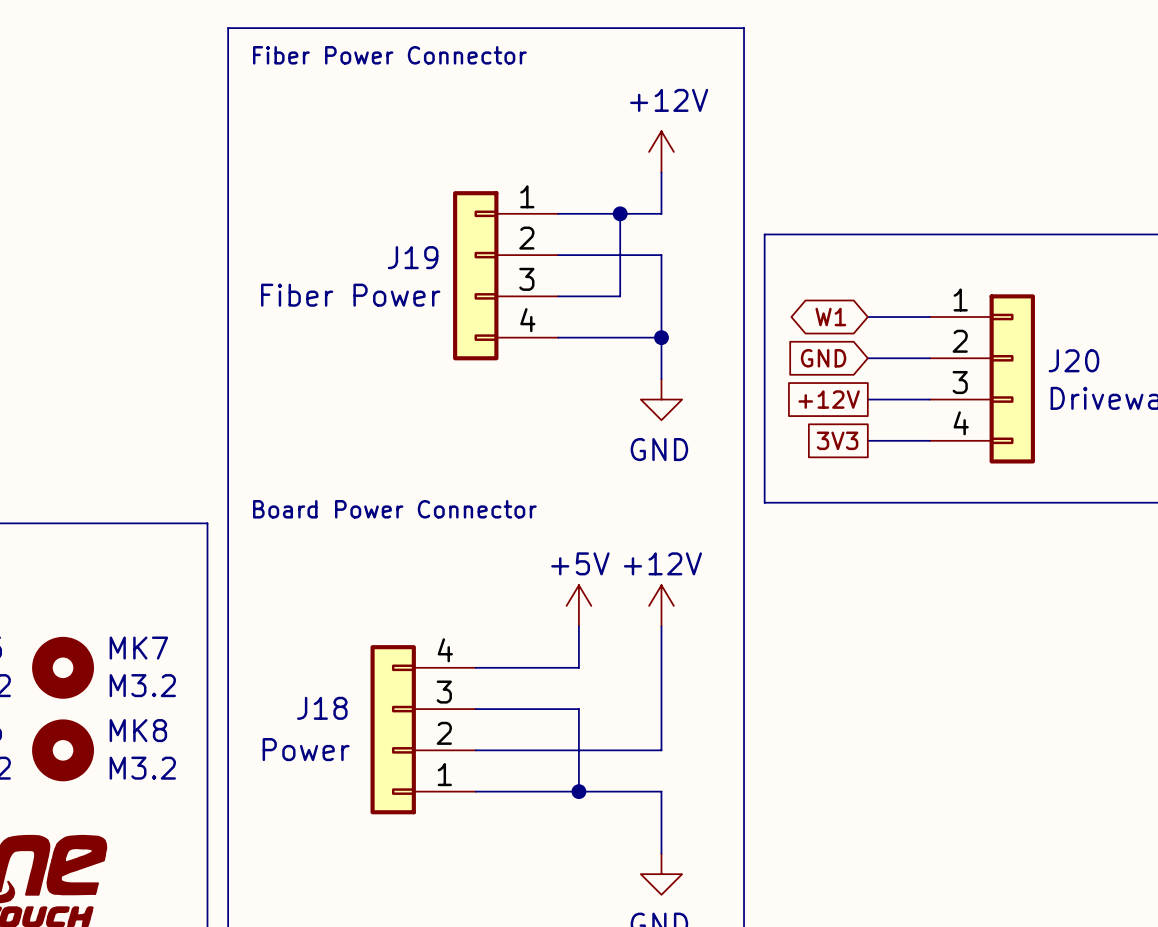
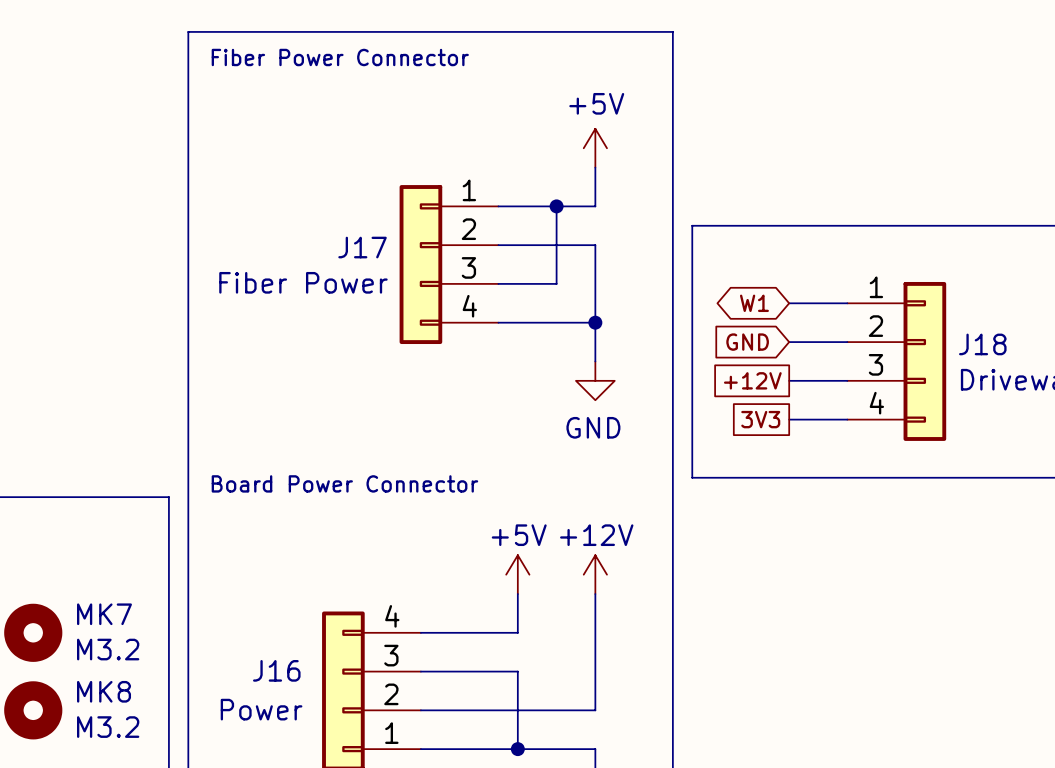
power symbol: +12V (661, 151) -> +5V (595, 148)
J19 name: J19 (413, 257) -> J17 (362, 247)
J20 name: J20 (1073, 360) -> J18 (982, 344)
J18 name: J18 (322, 708) -> J16 (276, 670)

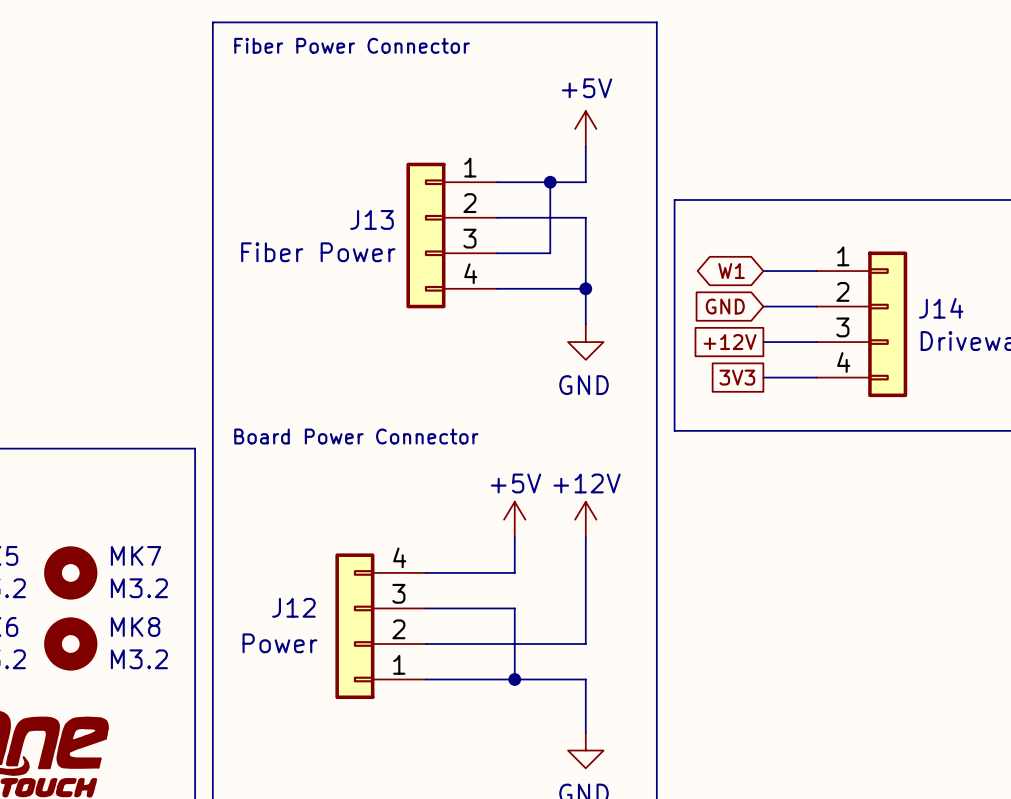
J17 name: J17 (362, 247) -> J13 (372, 219)
J18 name: J18 (982, 344) -> J14 (941, 308)
J16 name: J16 (276, 670) -> J12 (293, 607)

